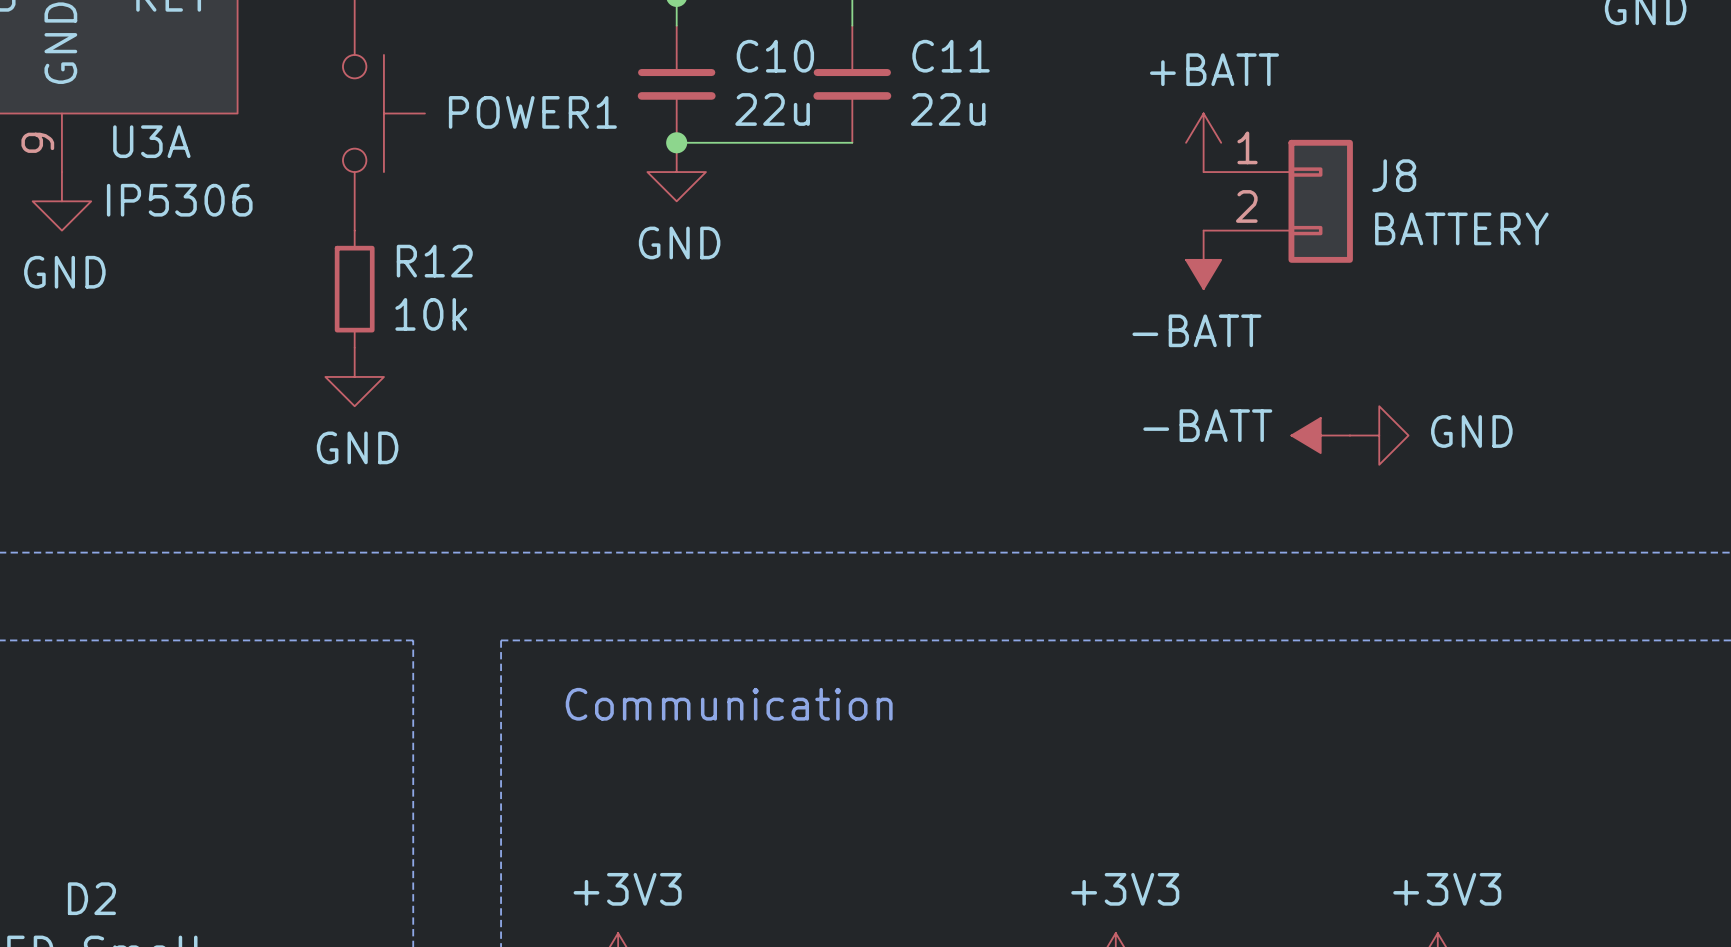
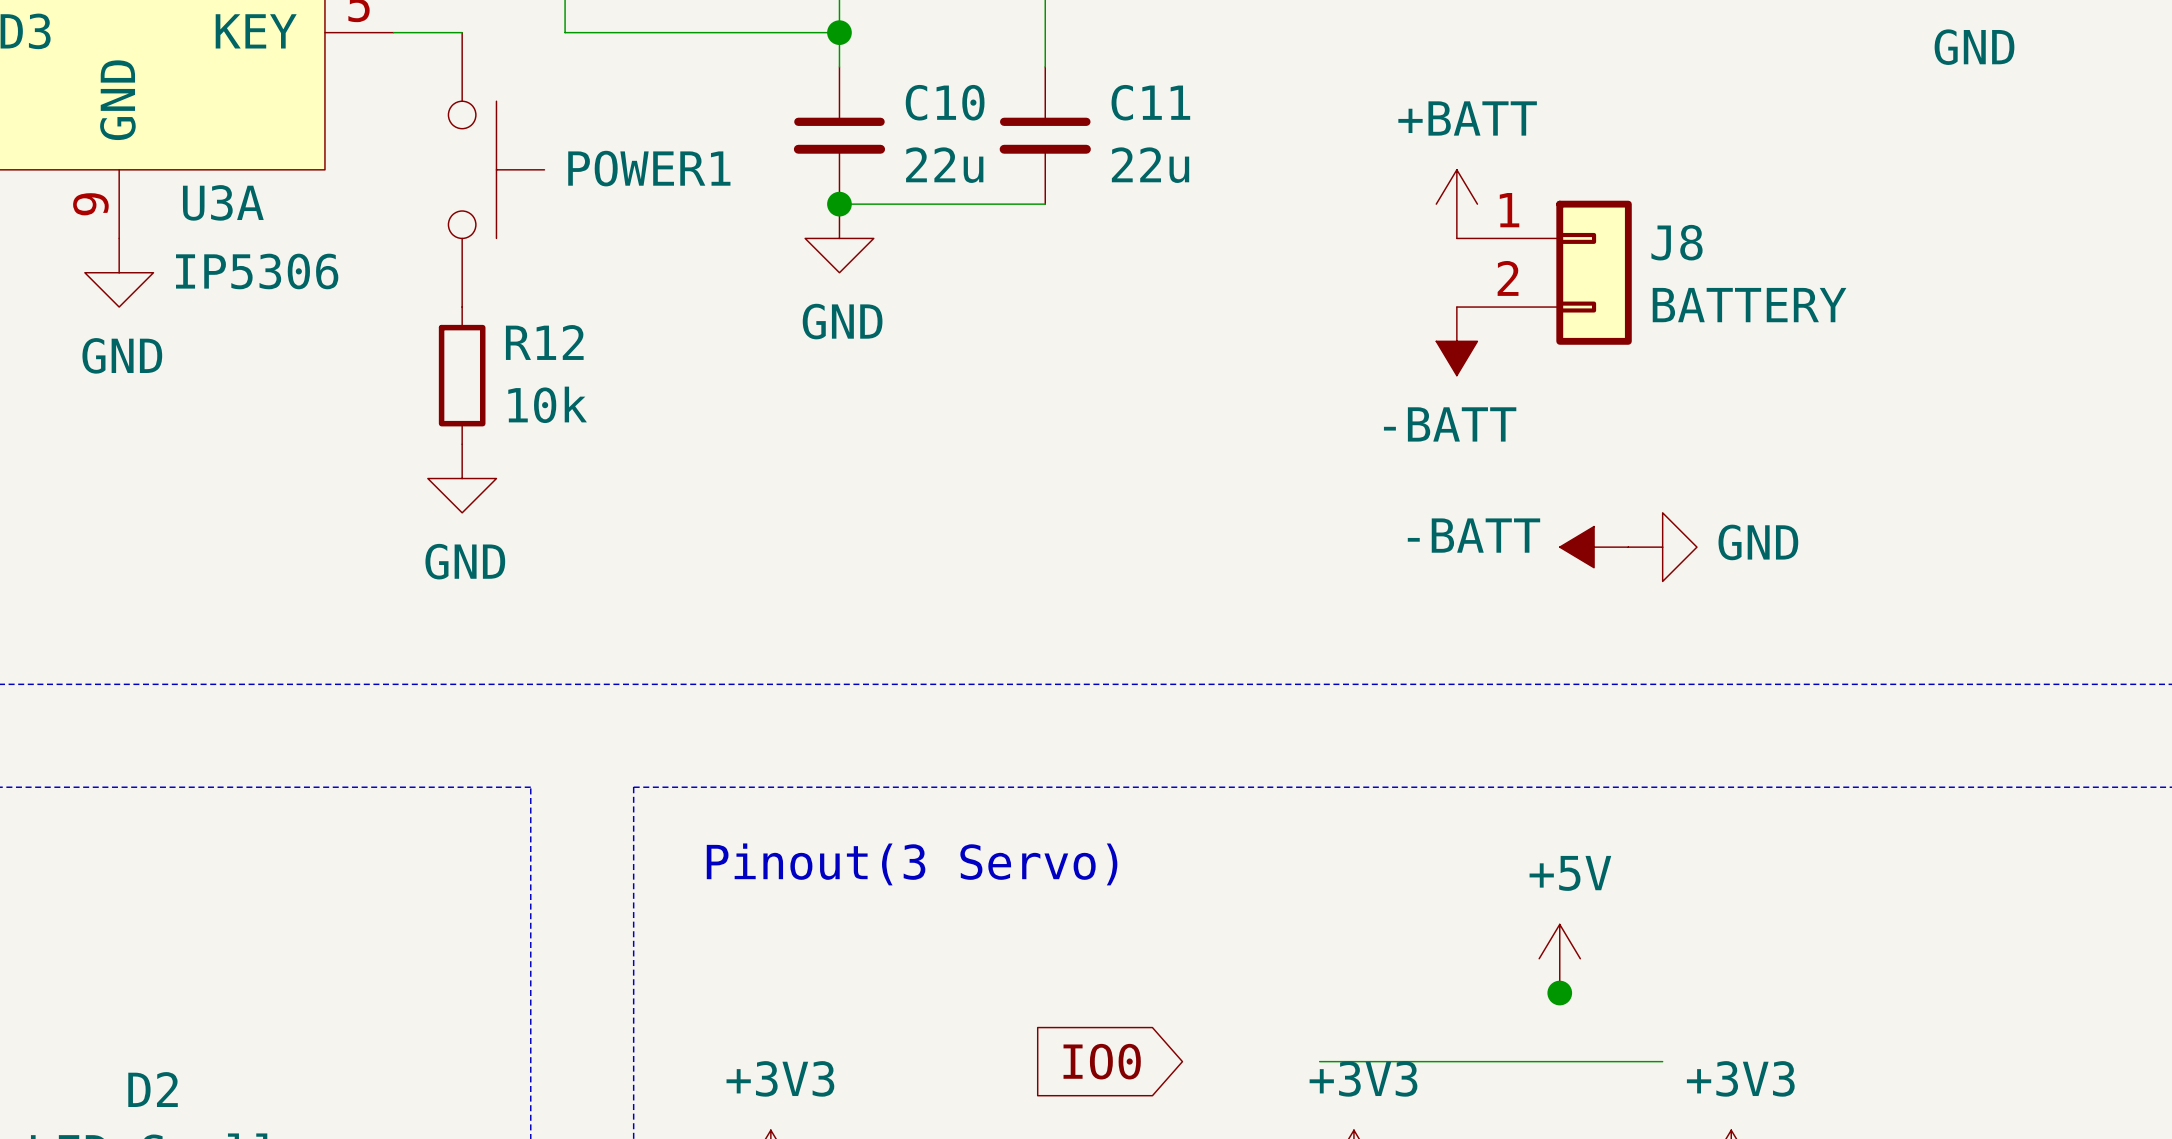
text: Communication (729, 704) -> Pinout(3 Servo) (912, 864)
power symbol: none -> +5V (1559, 958)
junction: none -> (1559, 993)
global label: none -> IO0 (1102, 1061)
wire: none -> (1319, 1061) (1662, 1061)

